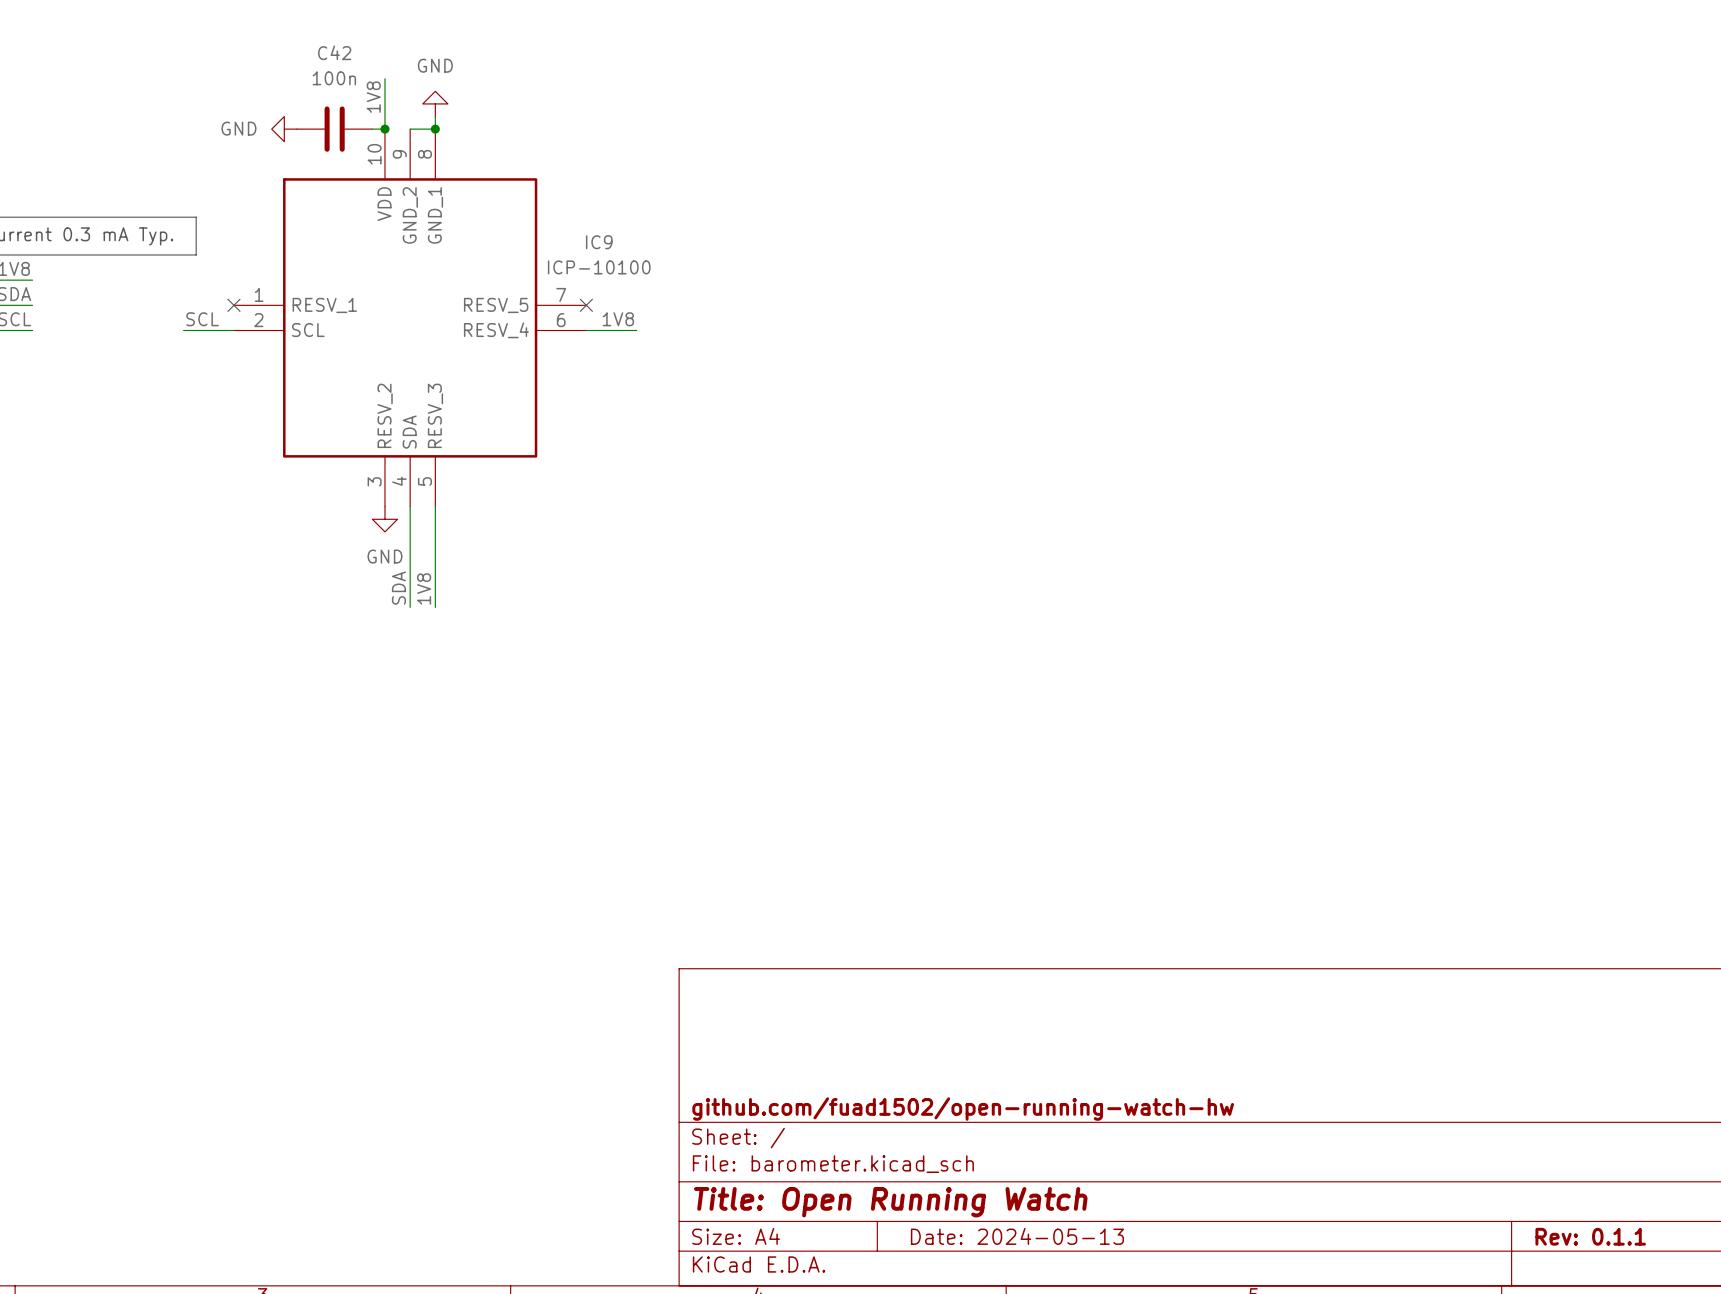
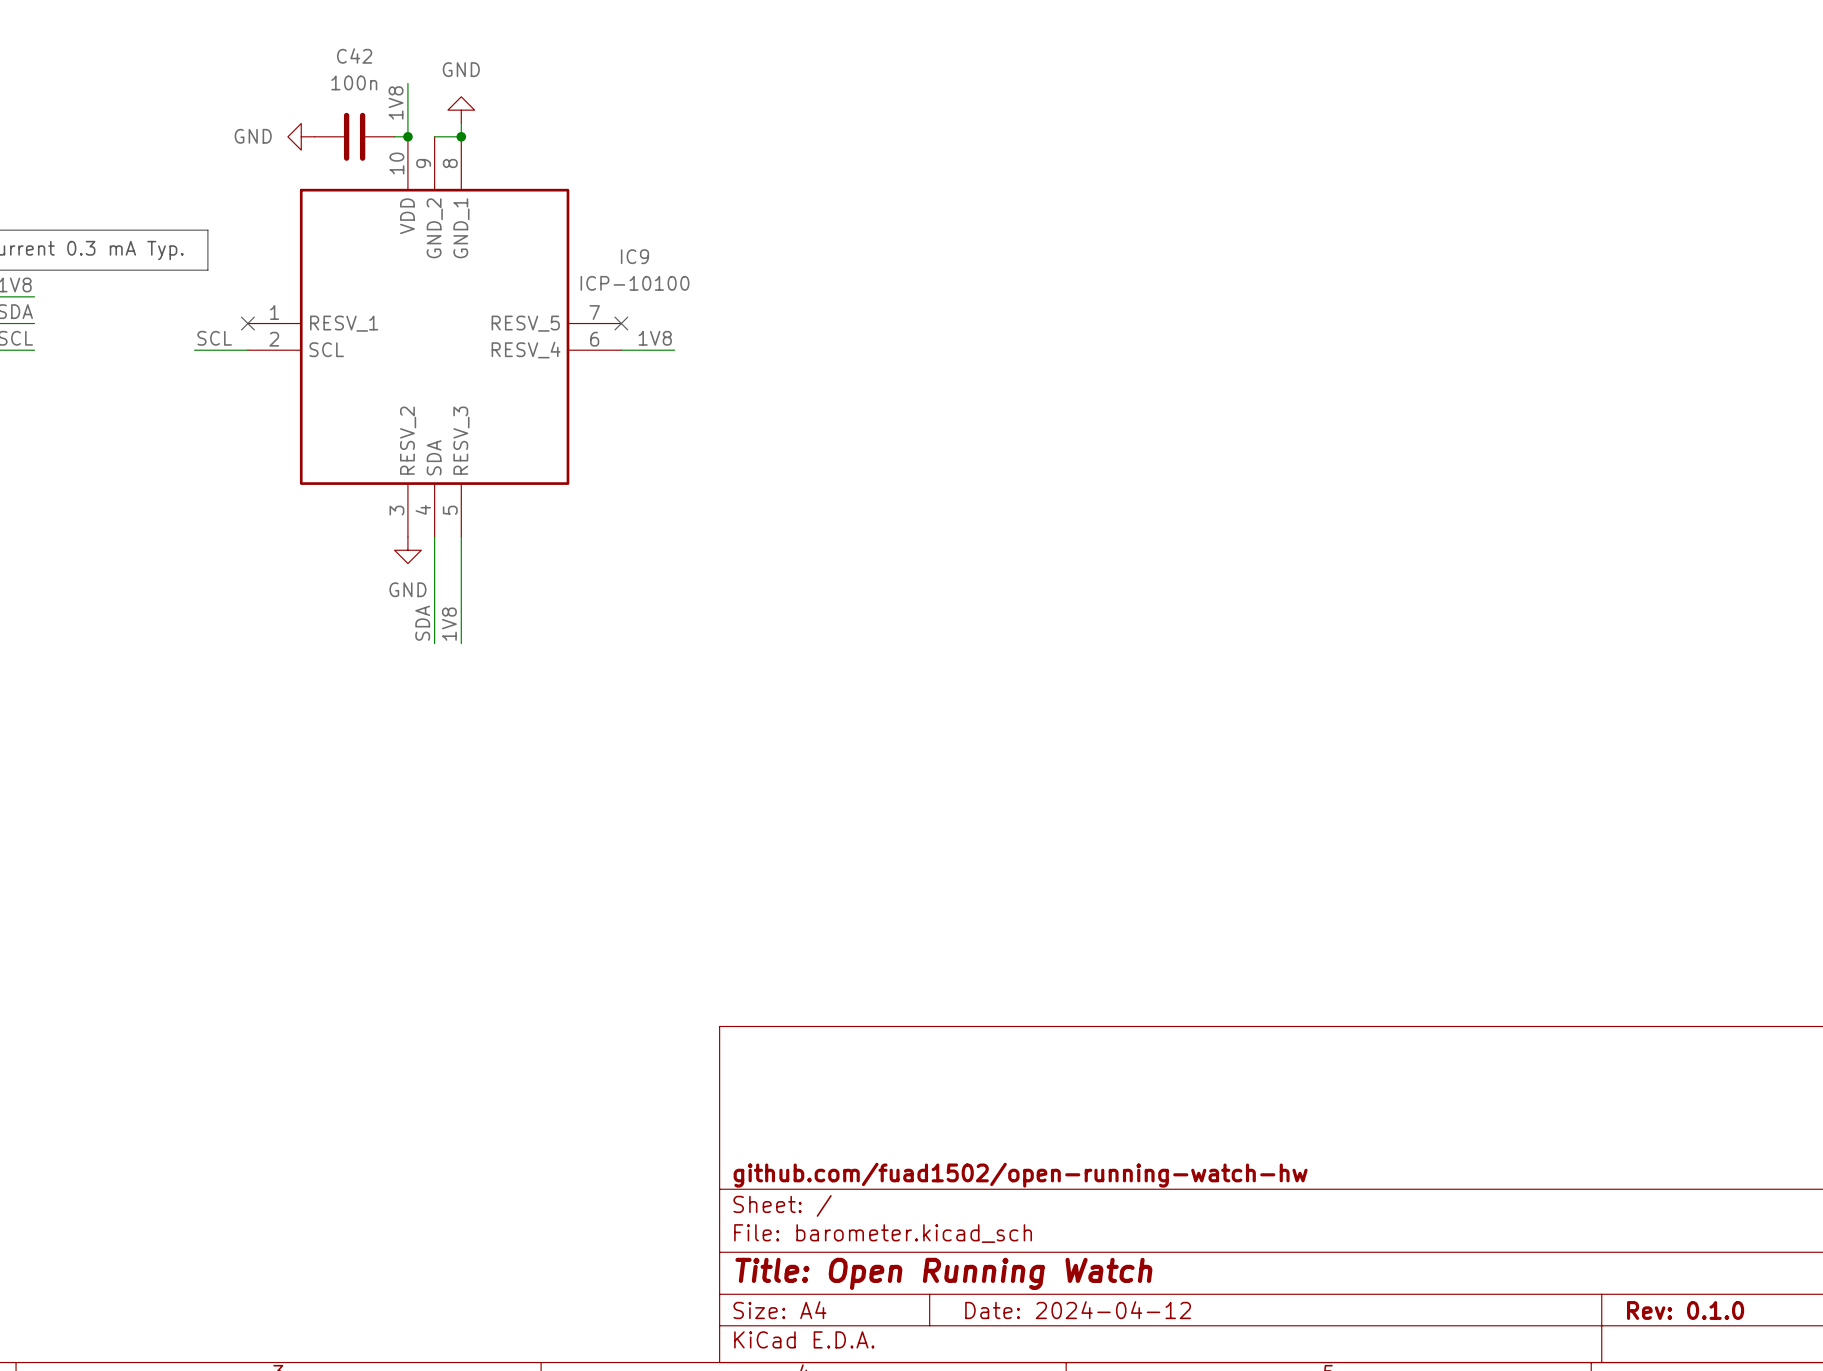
title block: Date: 2024-05-13 (1017, 1236) -> Date: 2024-04-12 (1078, 1310)
title block: Rev: 0.1.1 (1590, 1236) -> Rev: 0.1.0 (1685, 1310)

